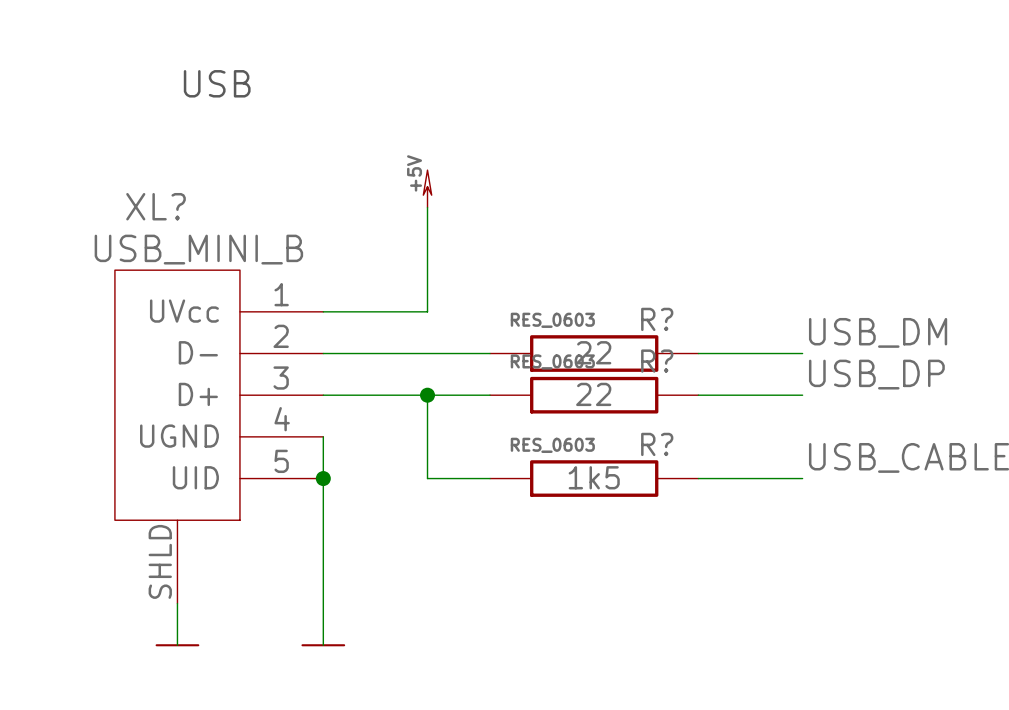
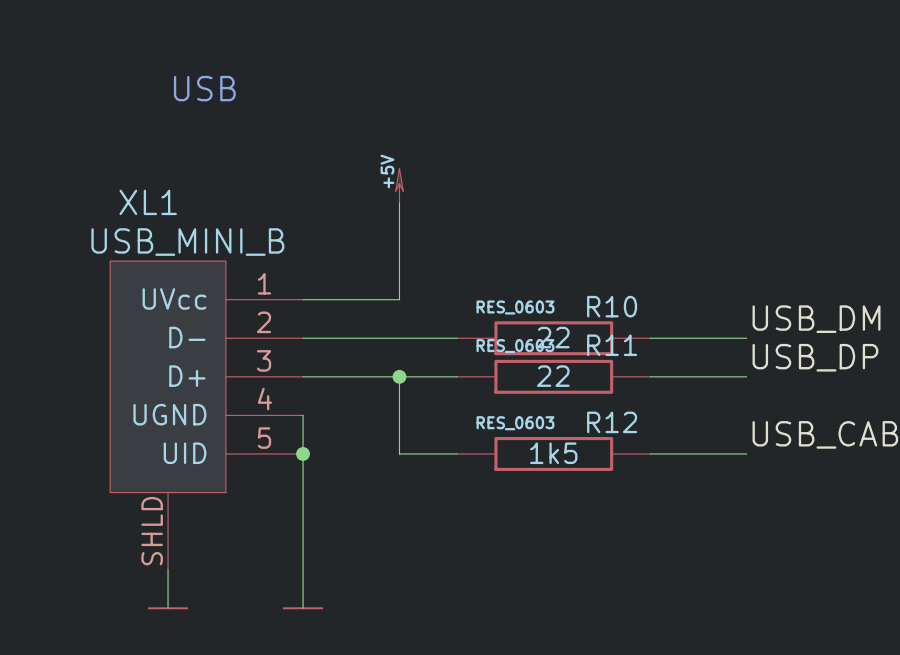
XL? name: XL? (156, 206) -> XL1 (148, 202)
R? name: R? (657, 319) -> R10 (612, 306)
R? name: R? (657, 361) -> R11 (612, 345)
R? name: R? (657, 444) -> R12 (612, 422)

